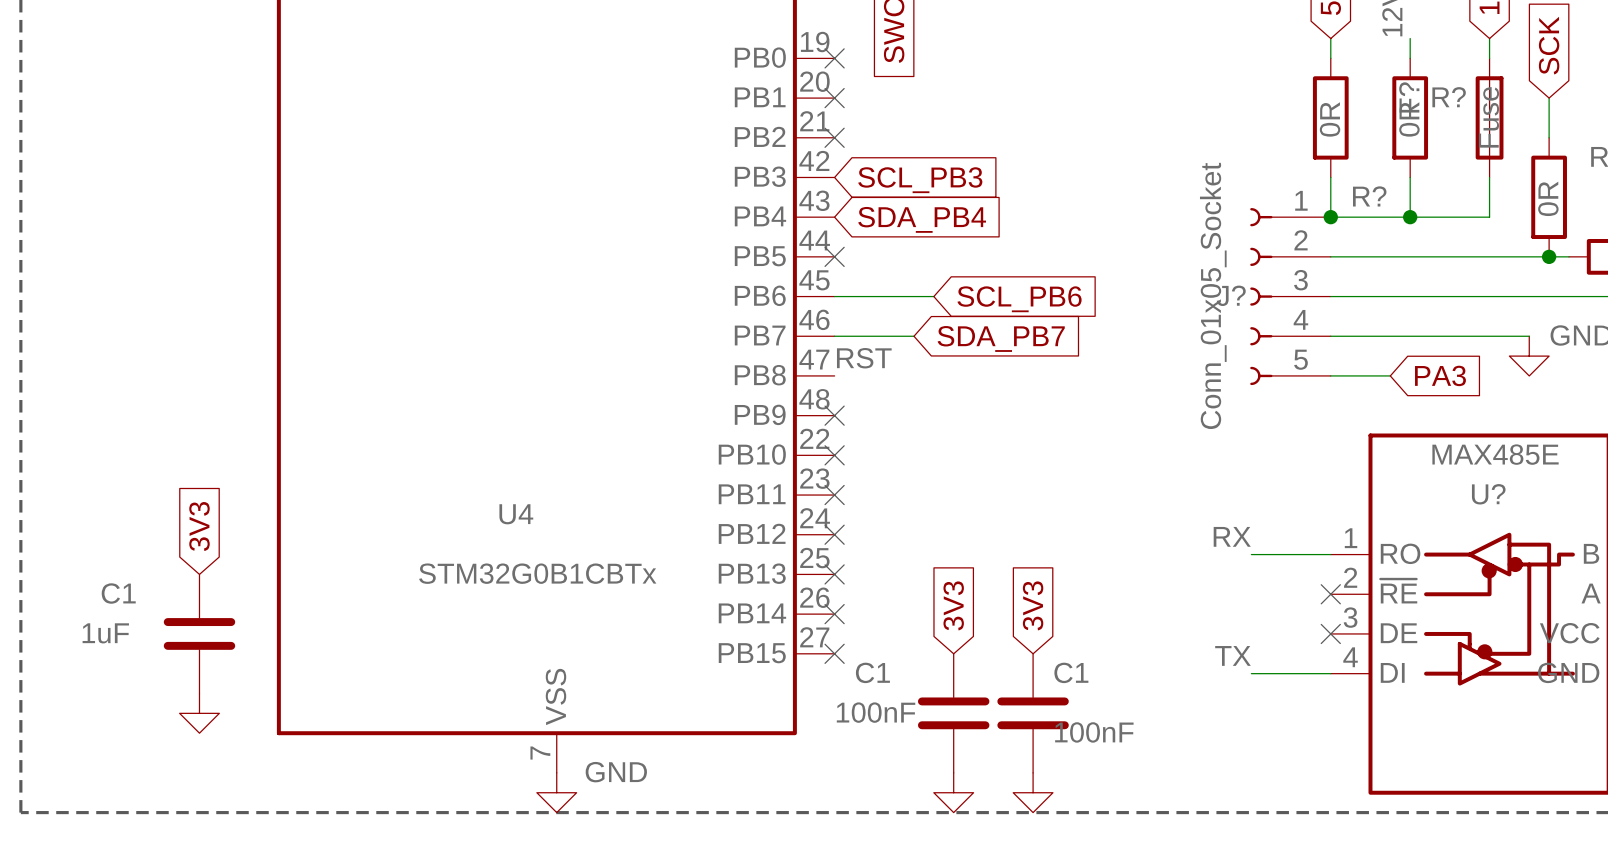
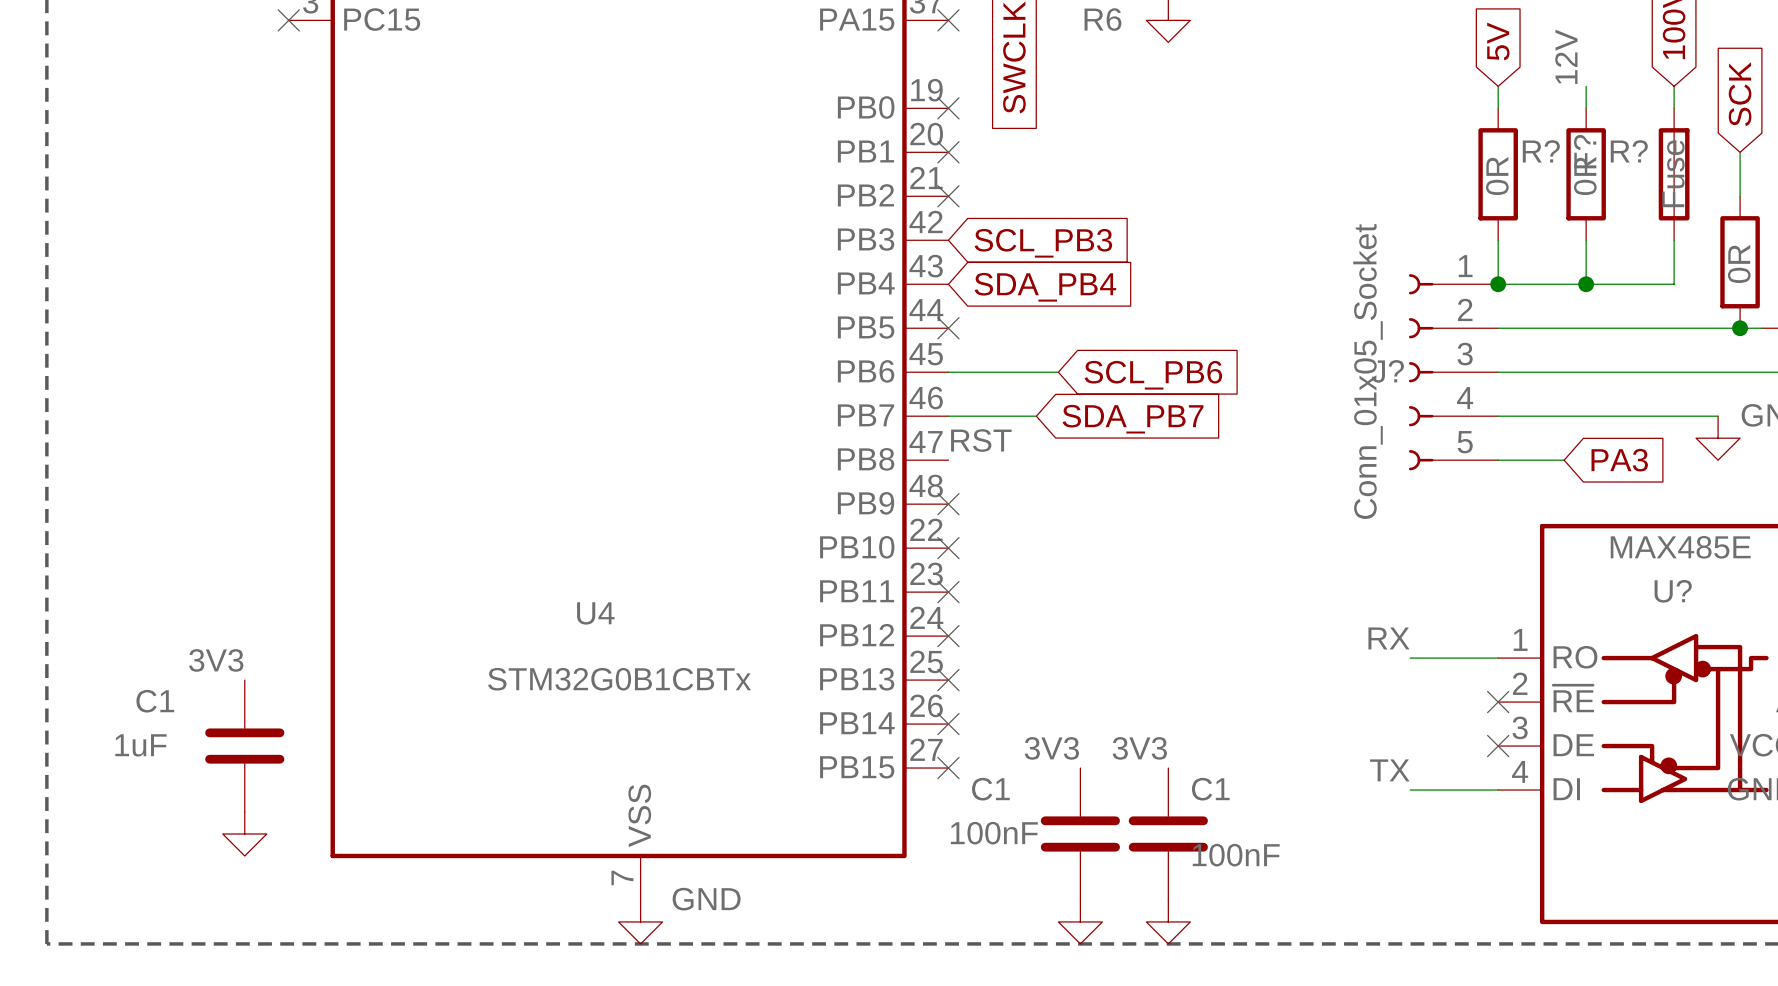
R? name position: R? (1369, 196) -> R? (1541, 151)
global label: 3V3 (199, 526) -> none
label: none -> 3V3 (216, 660)
global label: 3V3 (953, 605) -> none
global label: 3V3 (1033, 605) -> none
label: none -> 3V3 (1051, 748)
label: none -> 3V3 (1139, 748)

